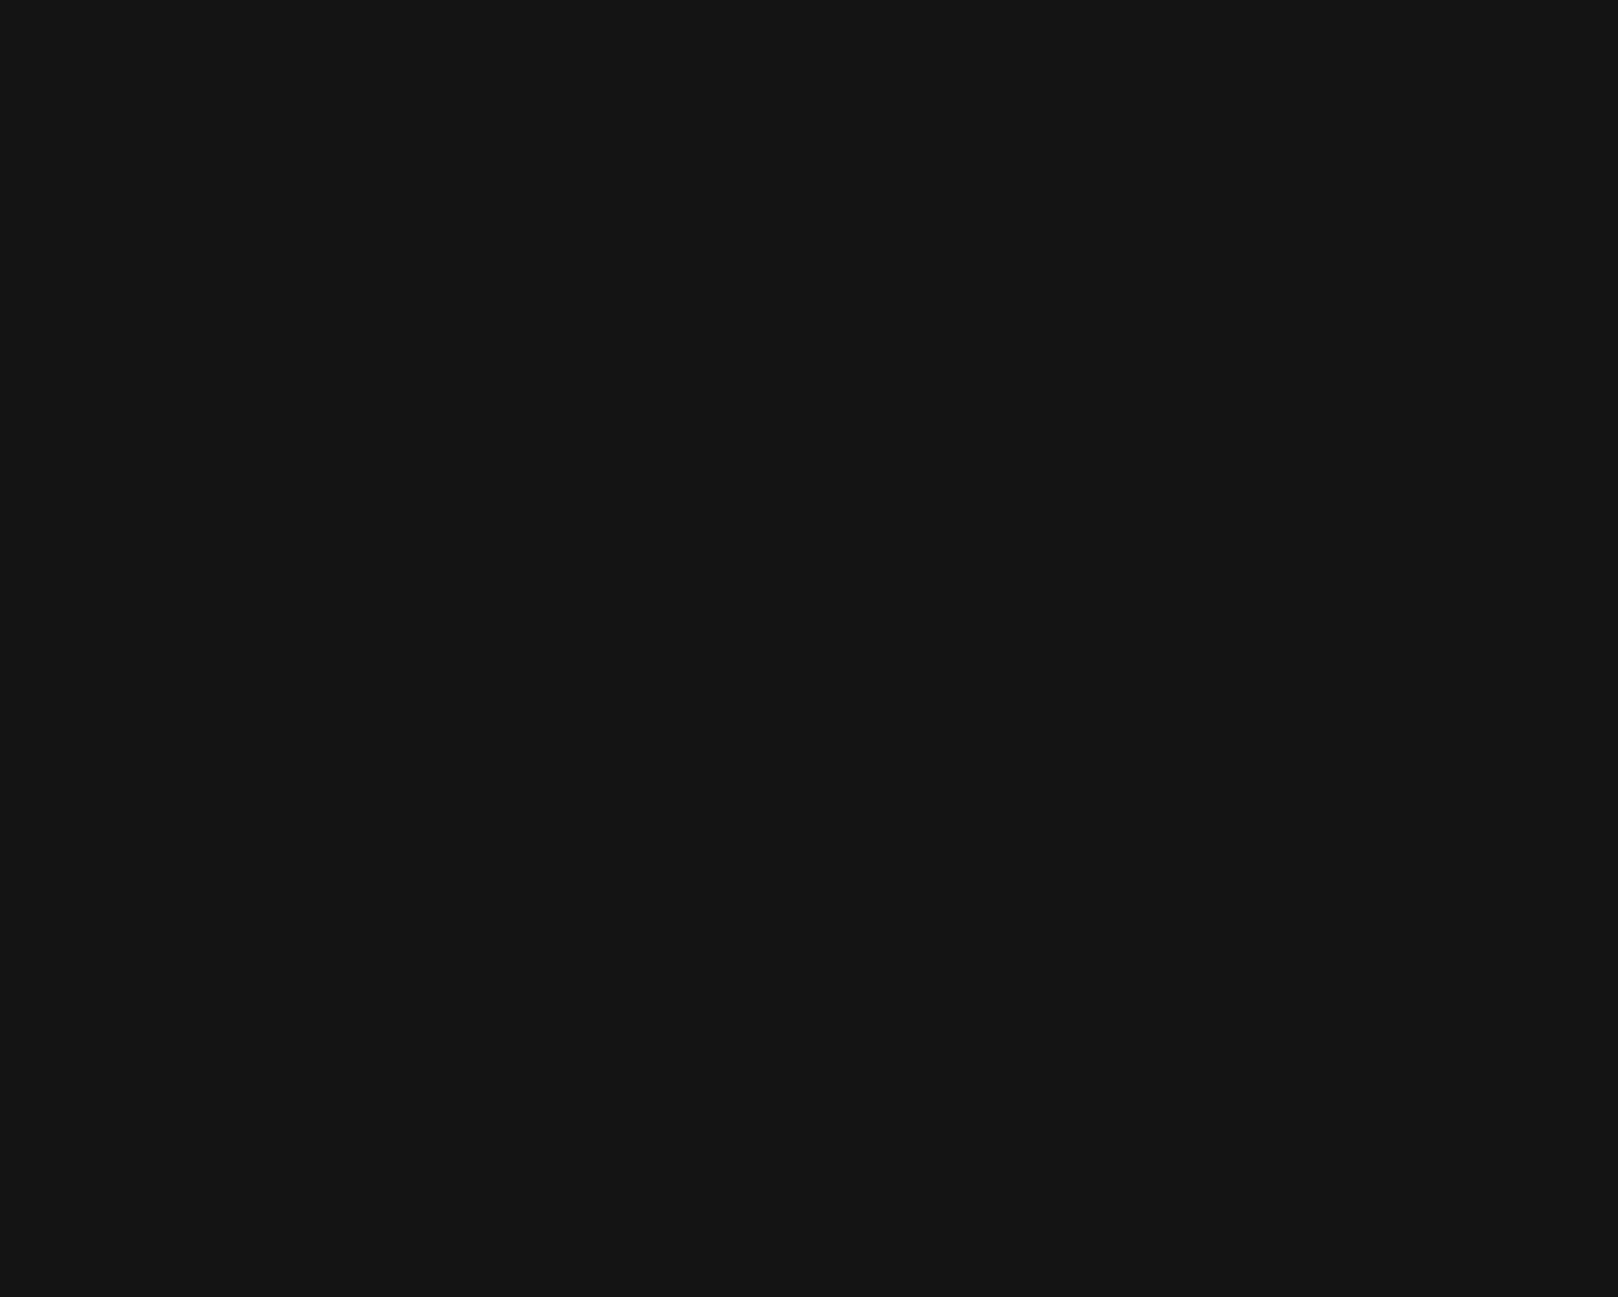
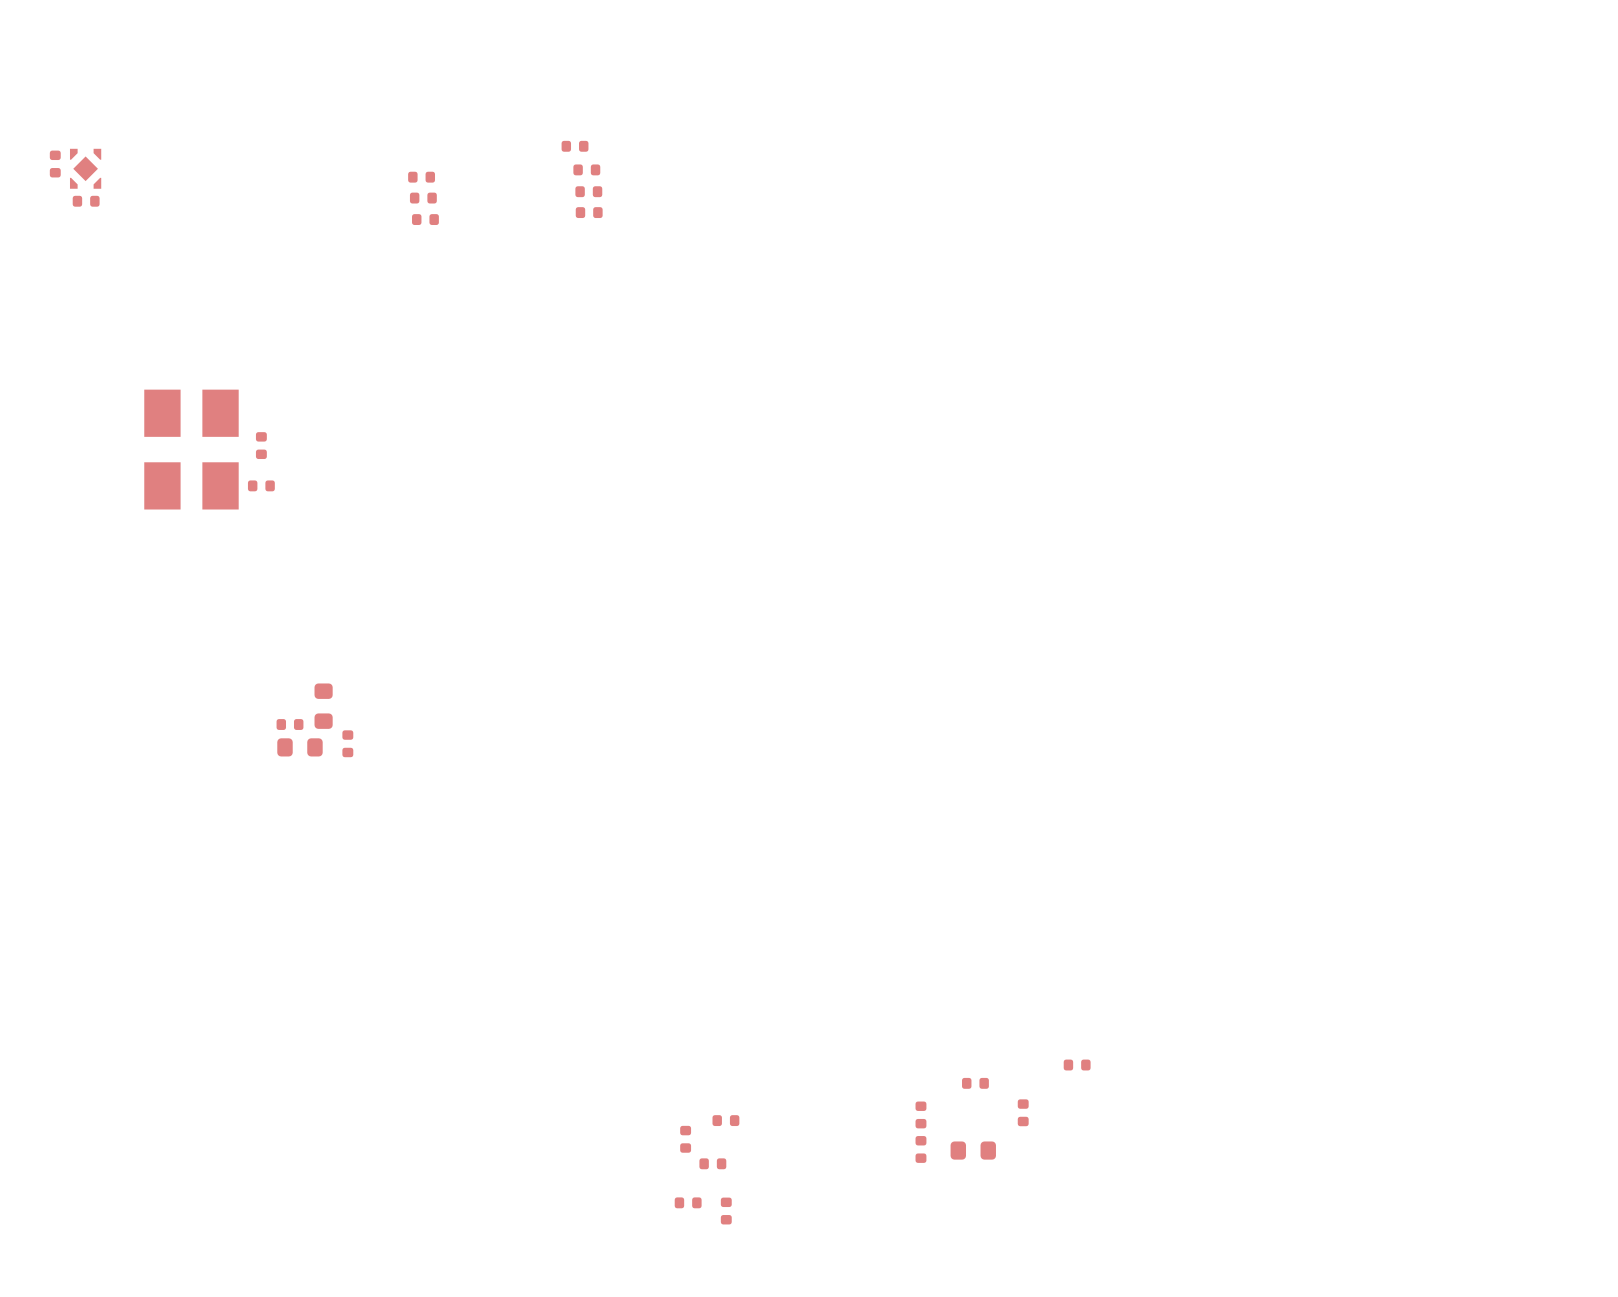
part: none -> (575, 146)
part: none -> (55, 164)
part: none -> (85, 168)
part: none -> (586, 169)
part: none -> (421, 177)
part: none -> (588, 191)
part: none -> (423, 198)
part: none -> (86, 201)
part: none -> (589, 212)
part: none -> (425, 219)
part: none -> (261, 445)
part: none -> (191, 449)
part: none -> (261, 485)
part: none -> (323, 706)
part: none -> (289, 724)
part: none -> (347, 743)
part: none -> (299, 747)
part: none -> (1077, 1065)
part: none -> (975, 1083)
part: none -> (1023, 1112)
part: none -> (920, 1114)
part: none -> (725, 1120)
part: none -> (685, 1139)
part: none -> (920, 1149)
part: none -> (973, 1150)
part: none -> (712, 1163)
part: none -> (688, 1202)
part: none -> (726, 1211)

